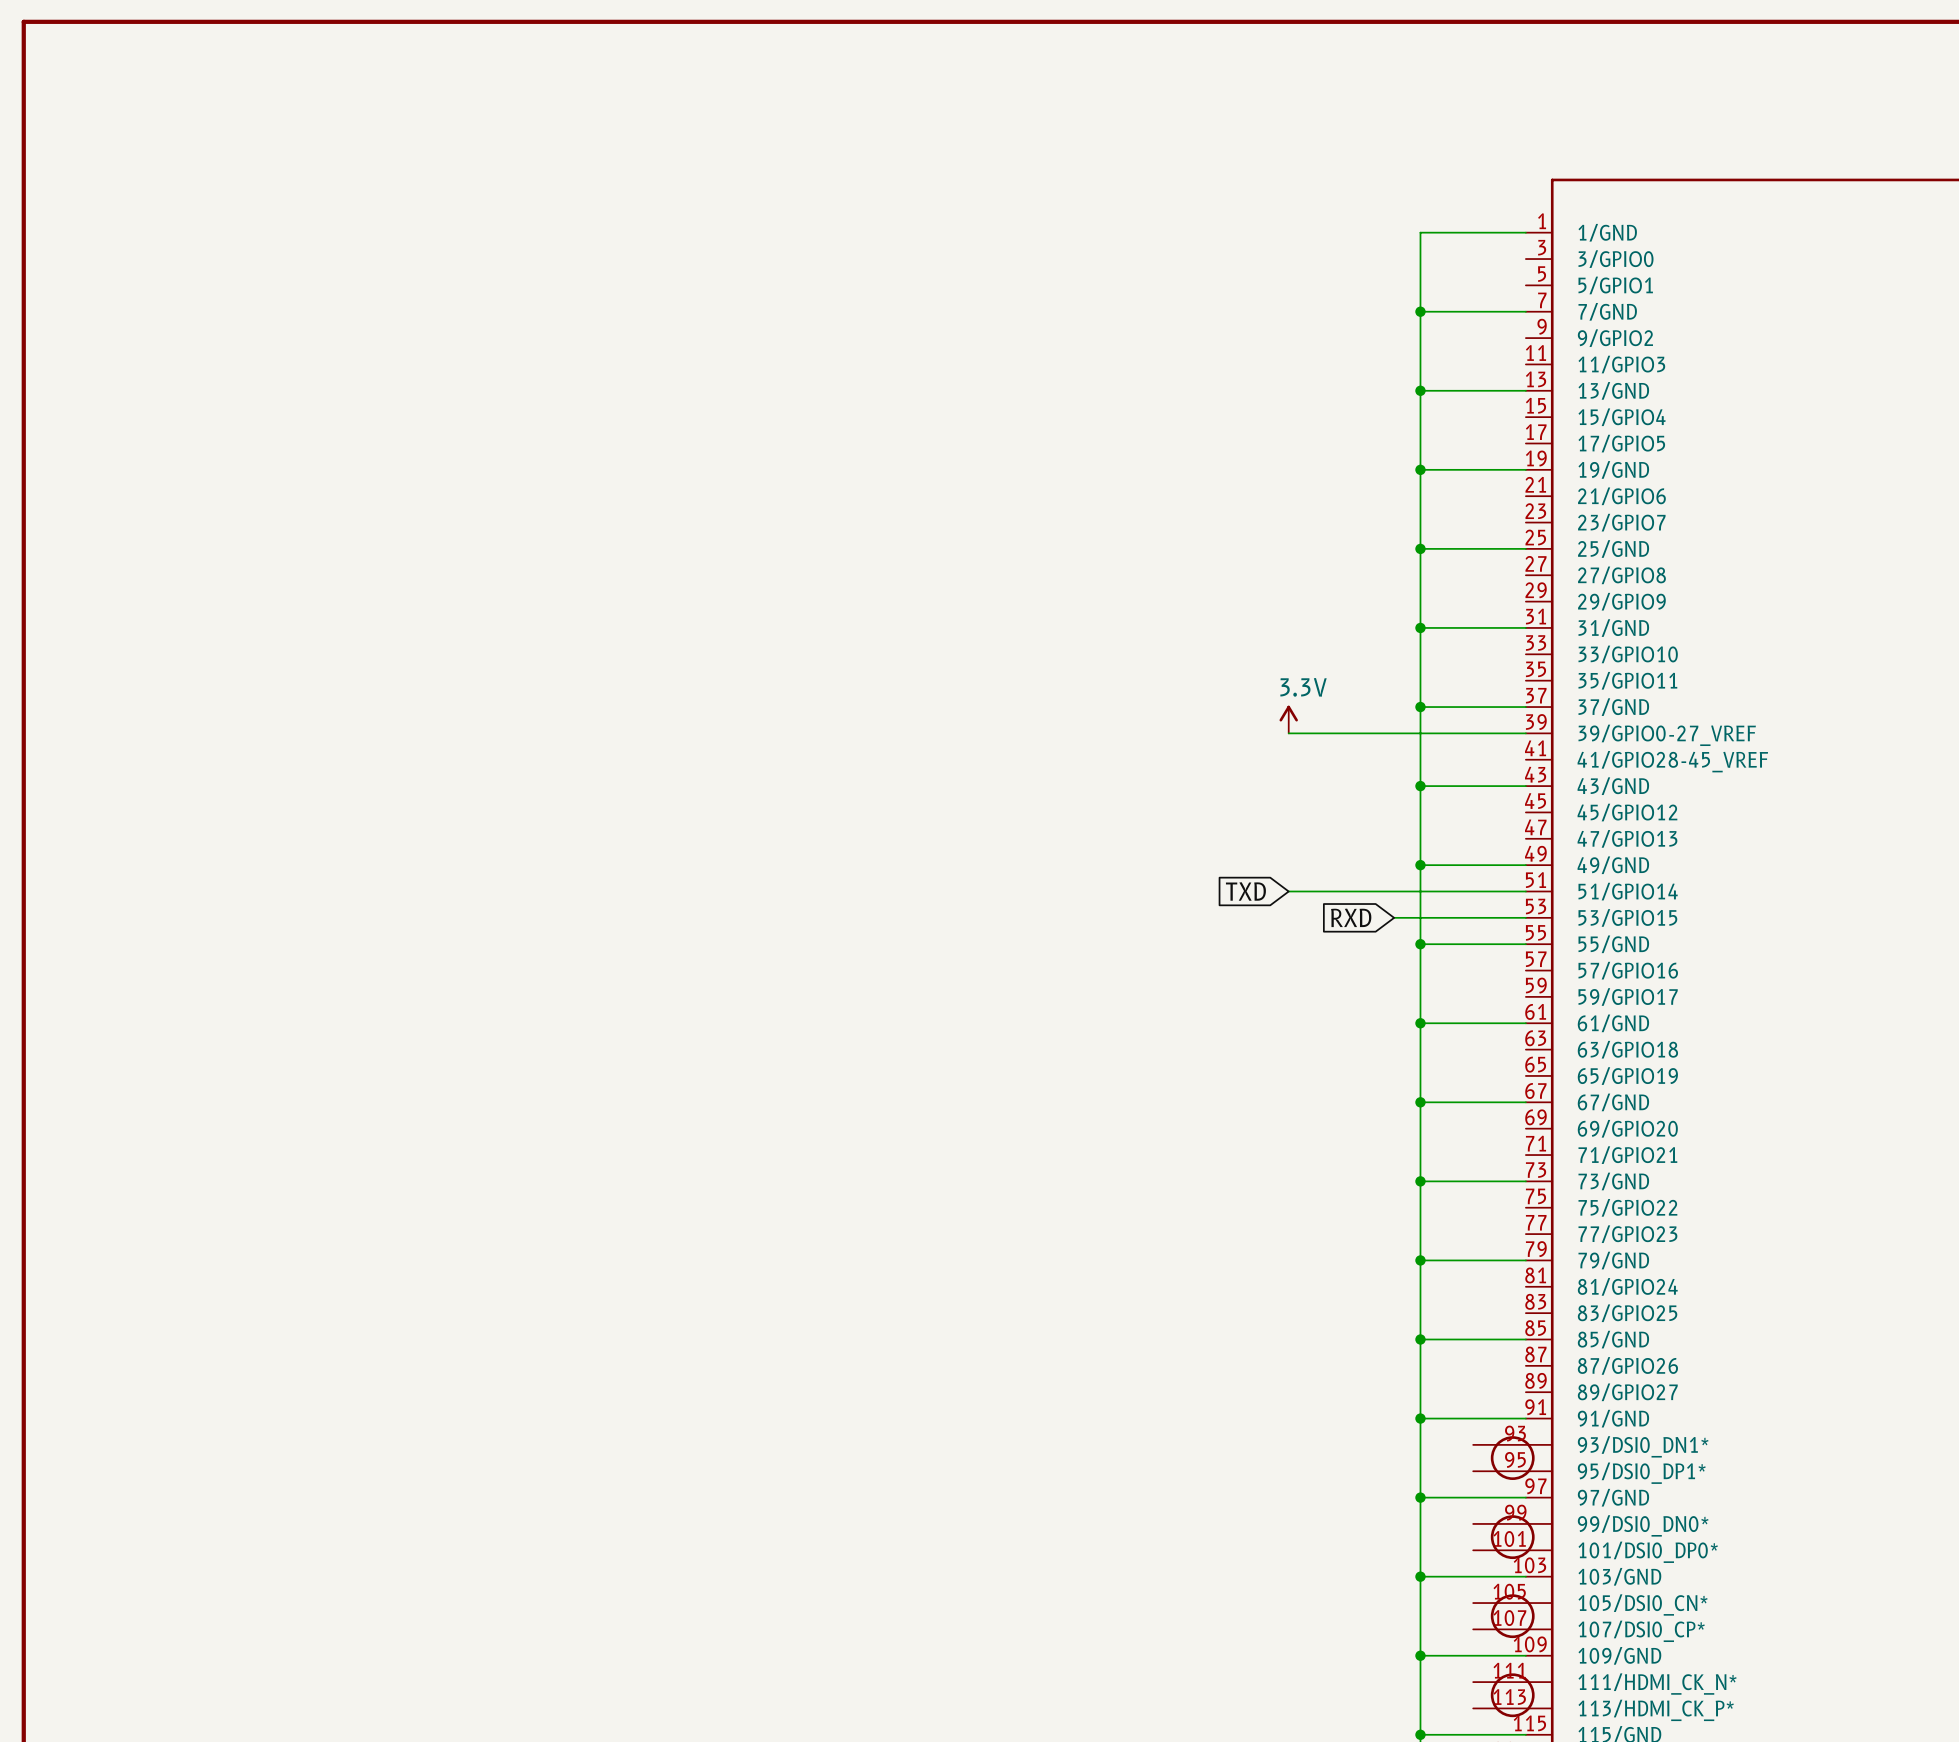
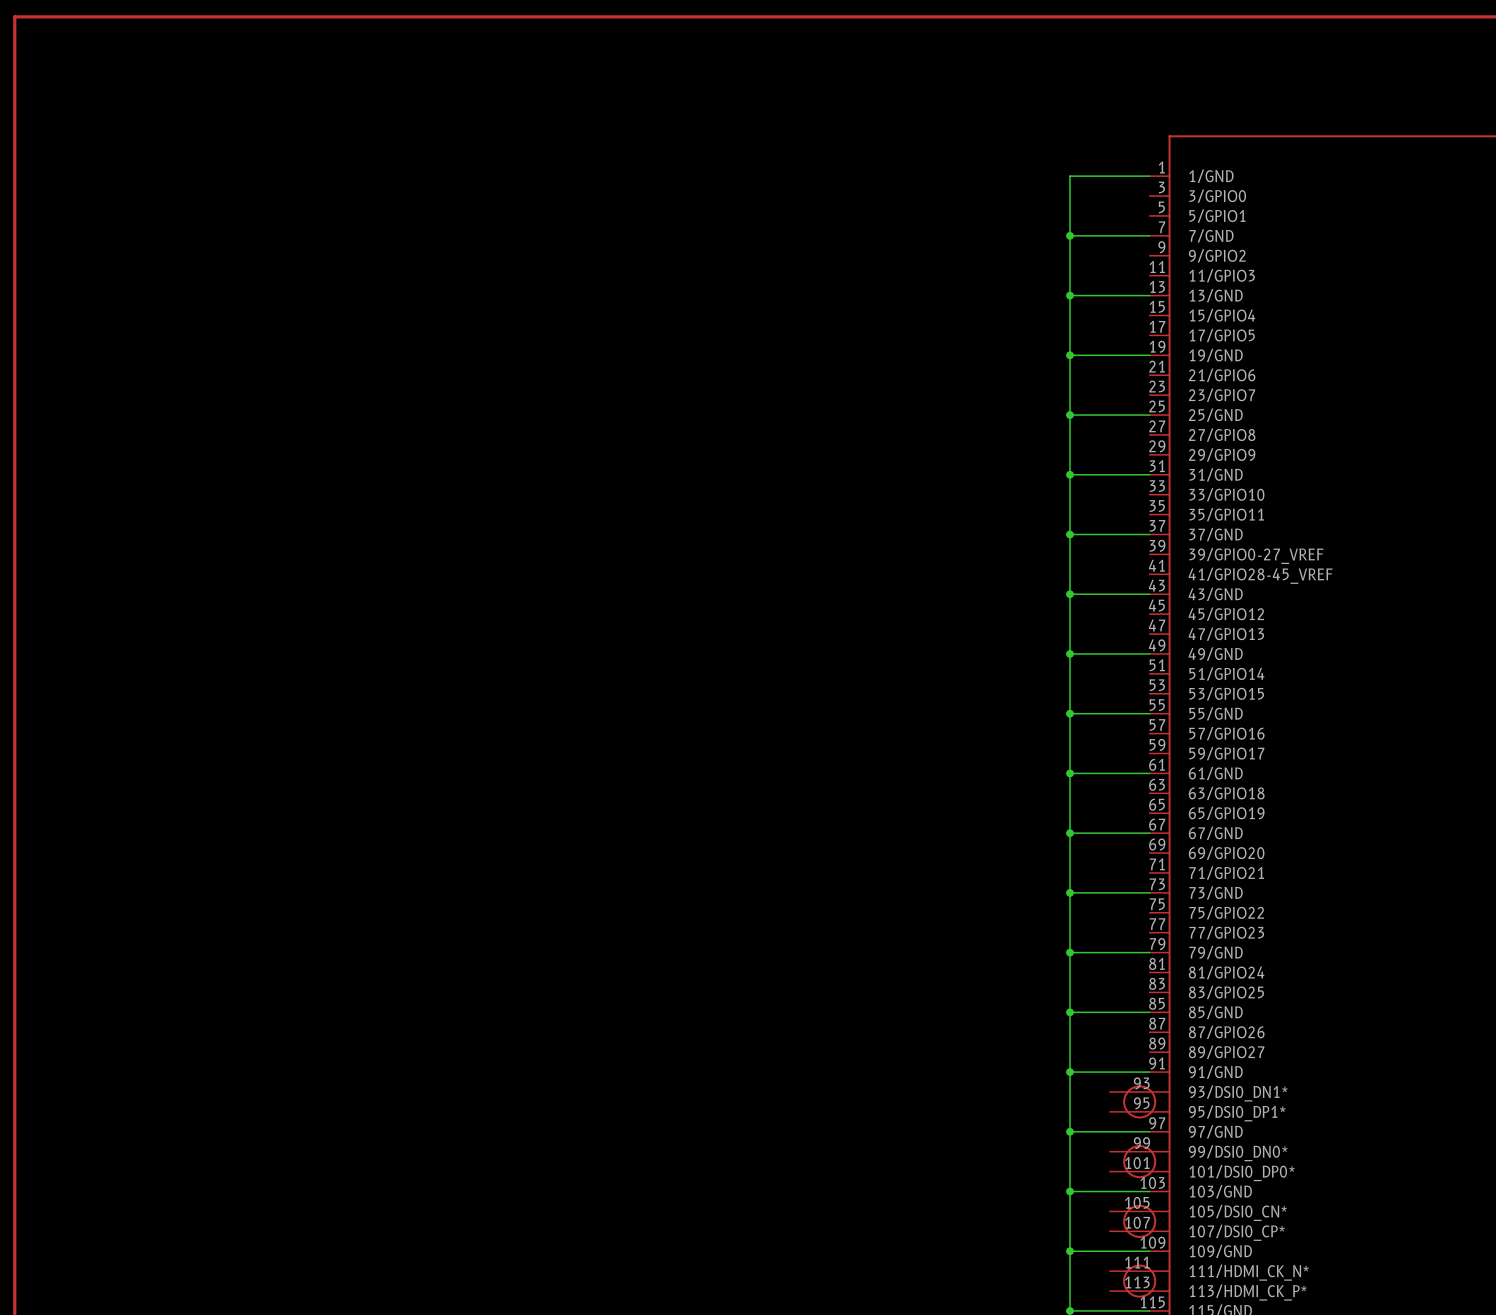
power symbol: 3.3V (1288, 719) -> none
wire: (1288, 733) (1525, 733) -> none
global label: TXD (1245, 891) -> none
wire: (1288, 891) (1525, 891) -> none
global label: RXD (1351, 917) -> none
wire: (1394, 917) (1525, 917) -> none

